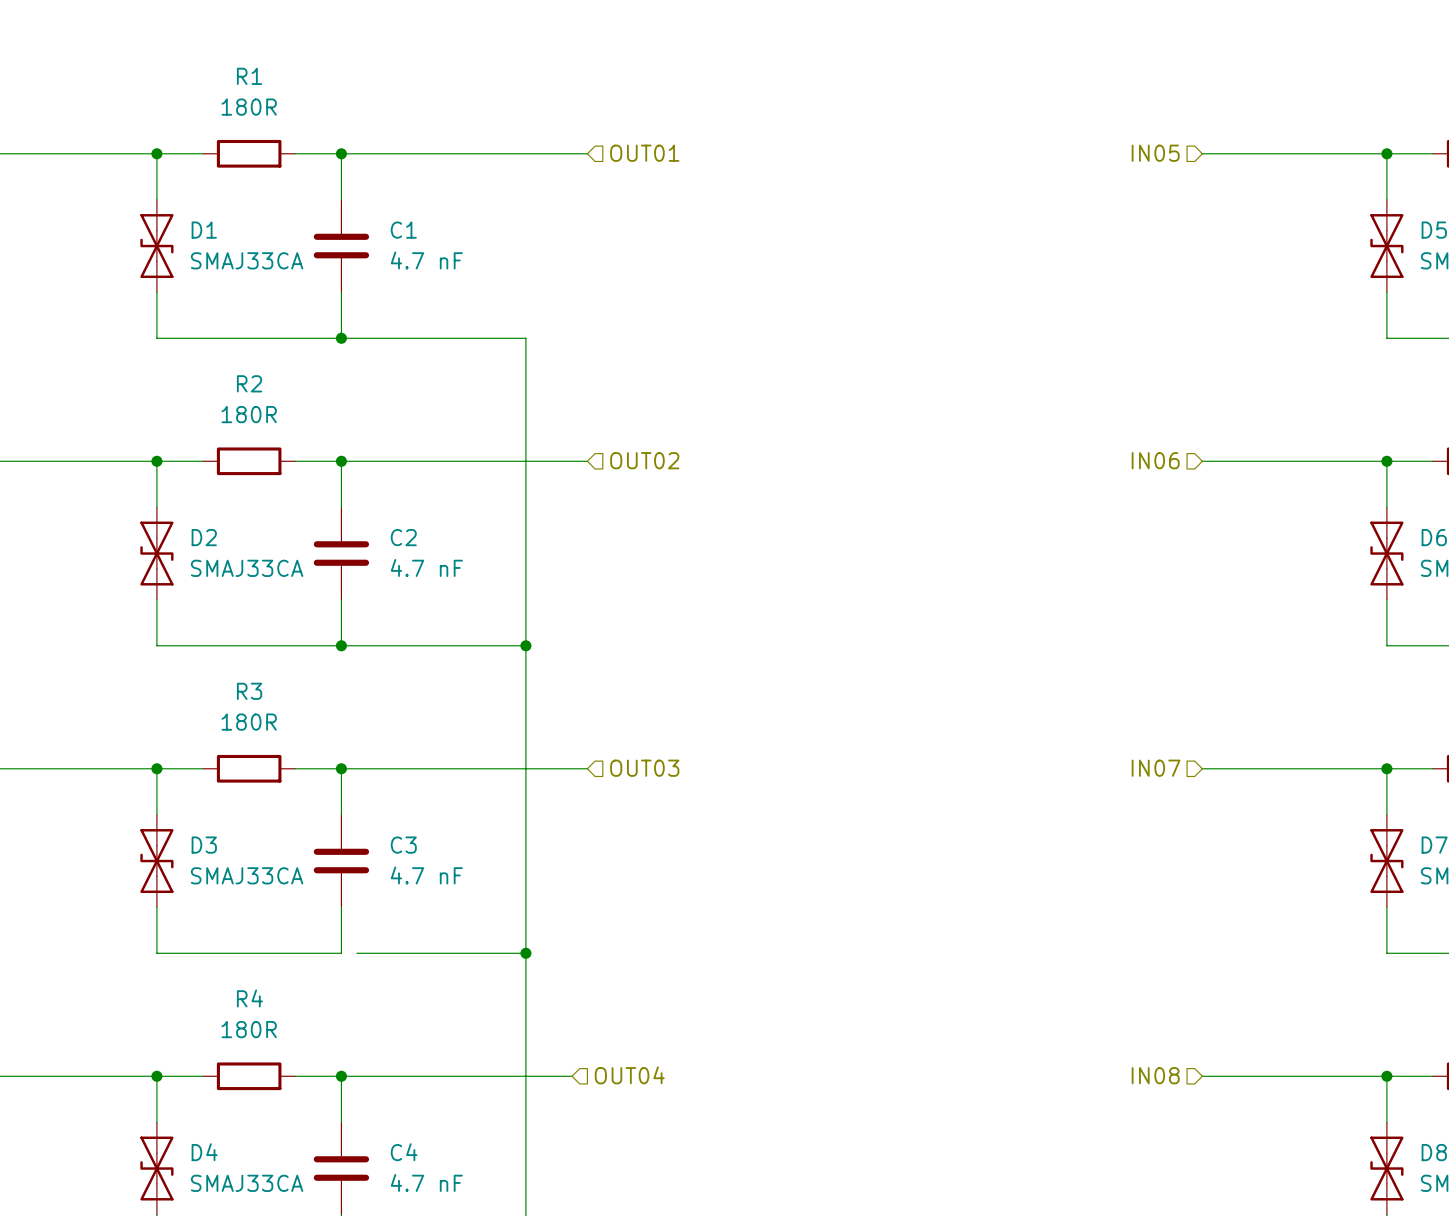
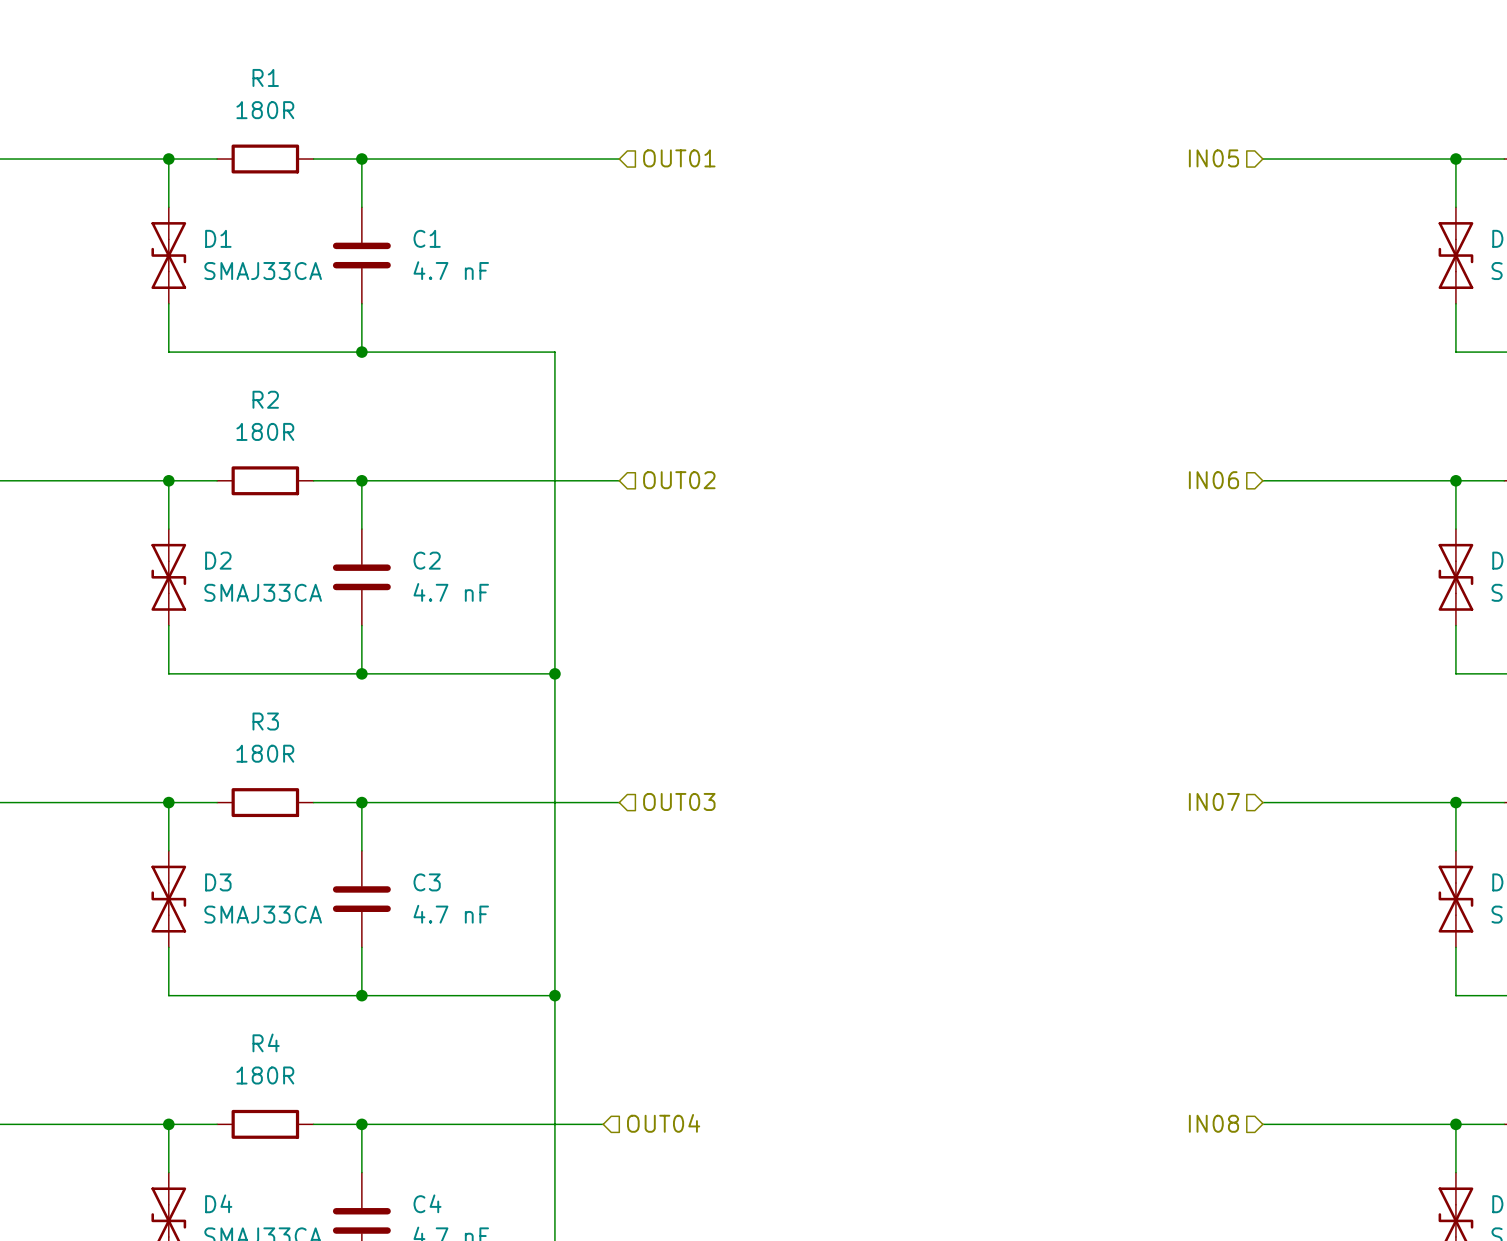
wire: none -> (361, 995) (377, 995)
junction: none -> (361, 995)

